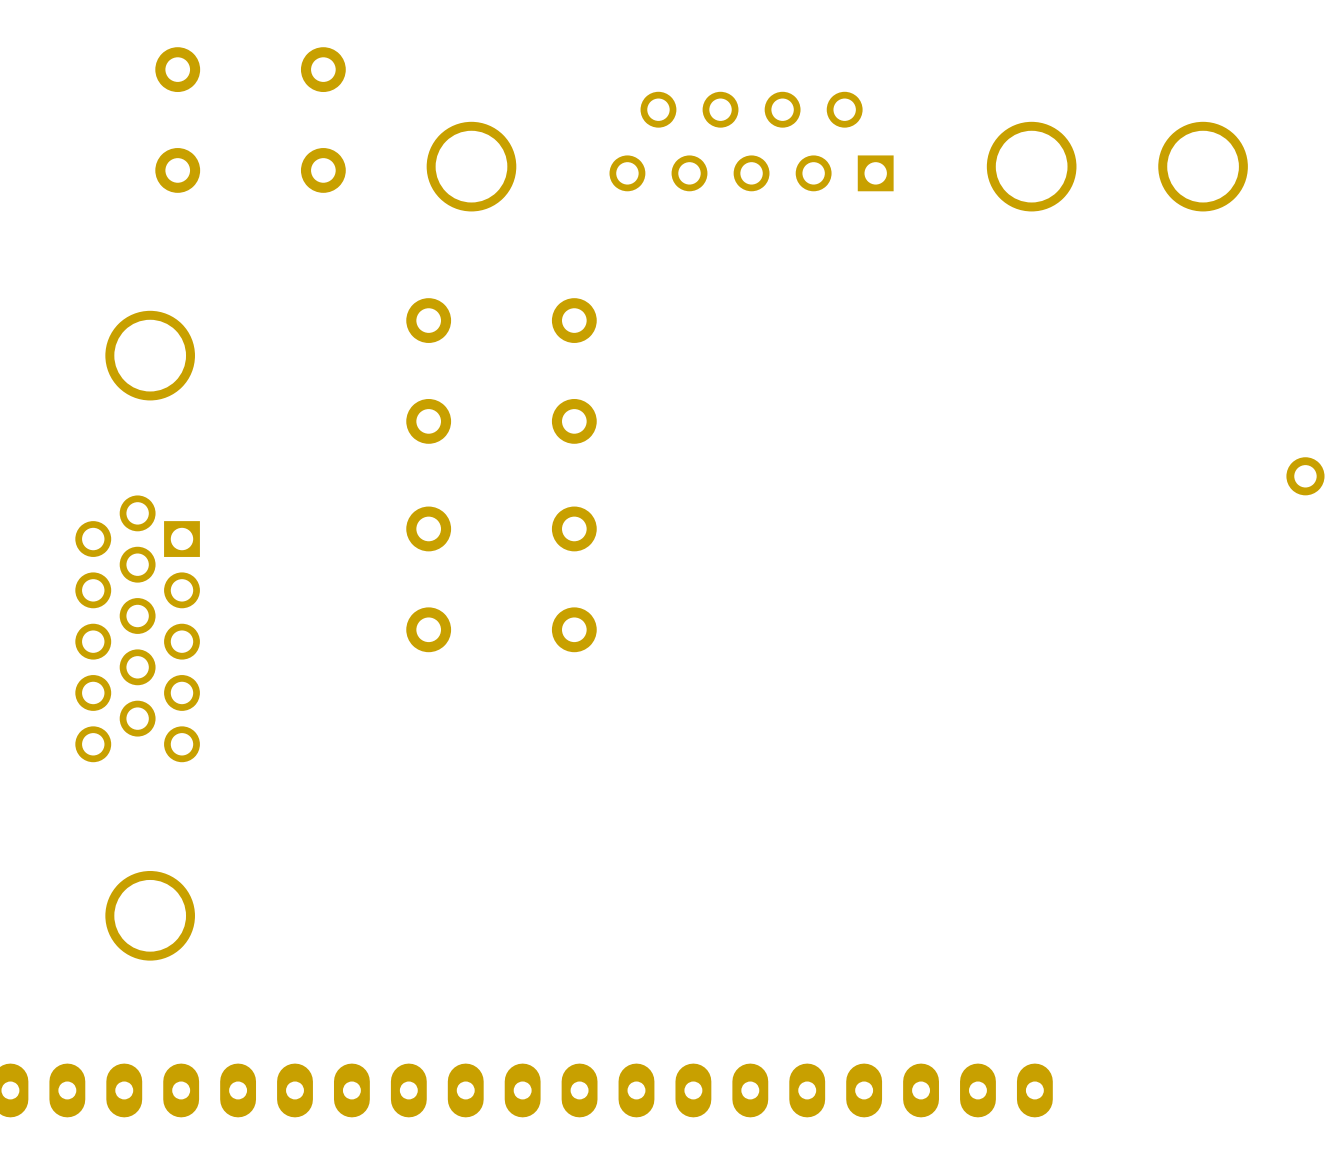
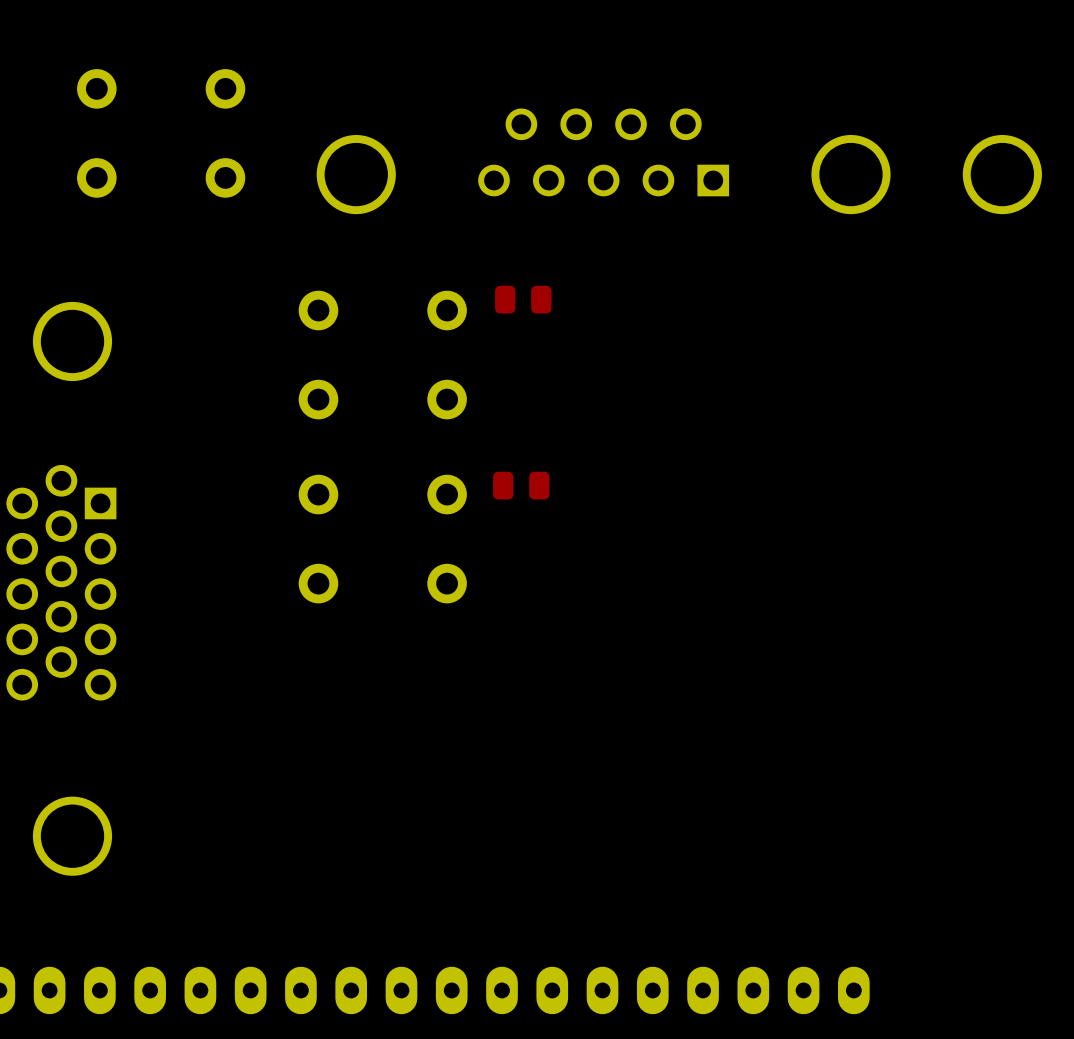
part: none -> (523, 299)
part: none -> (521, 485)

